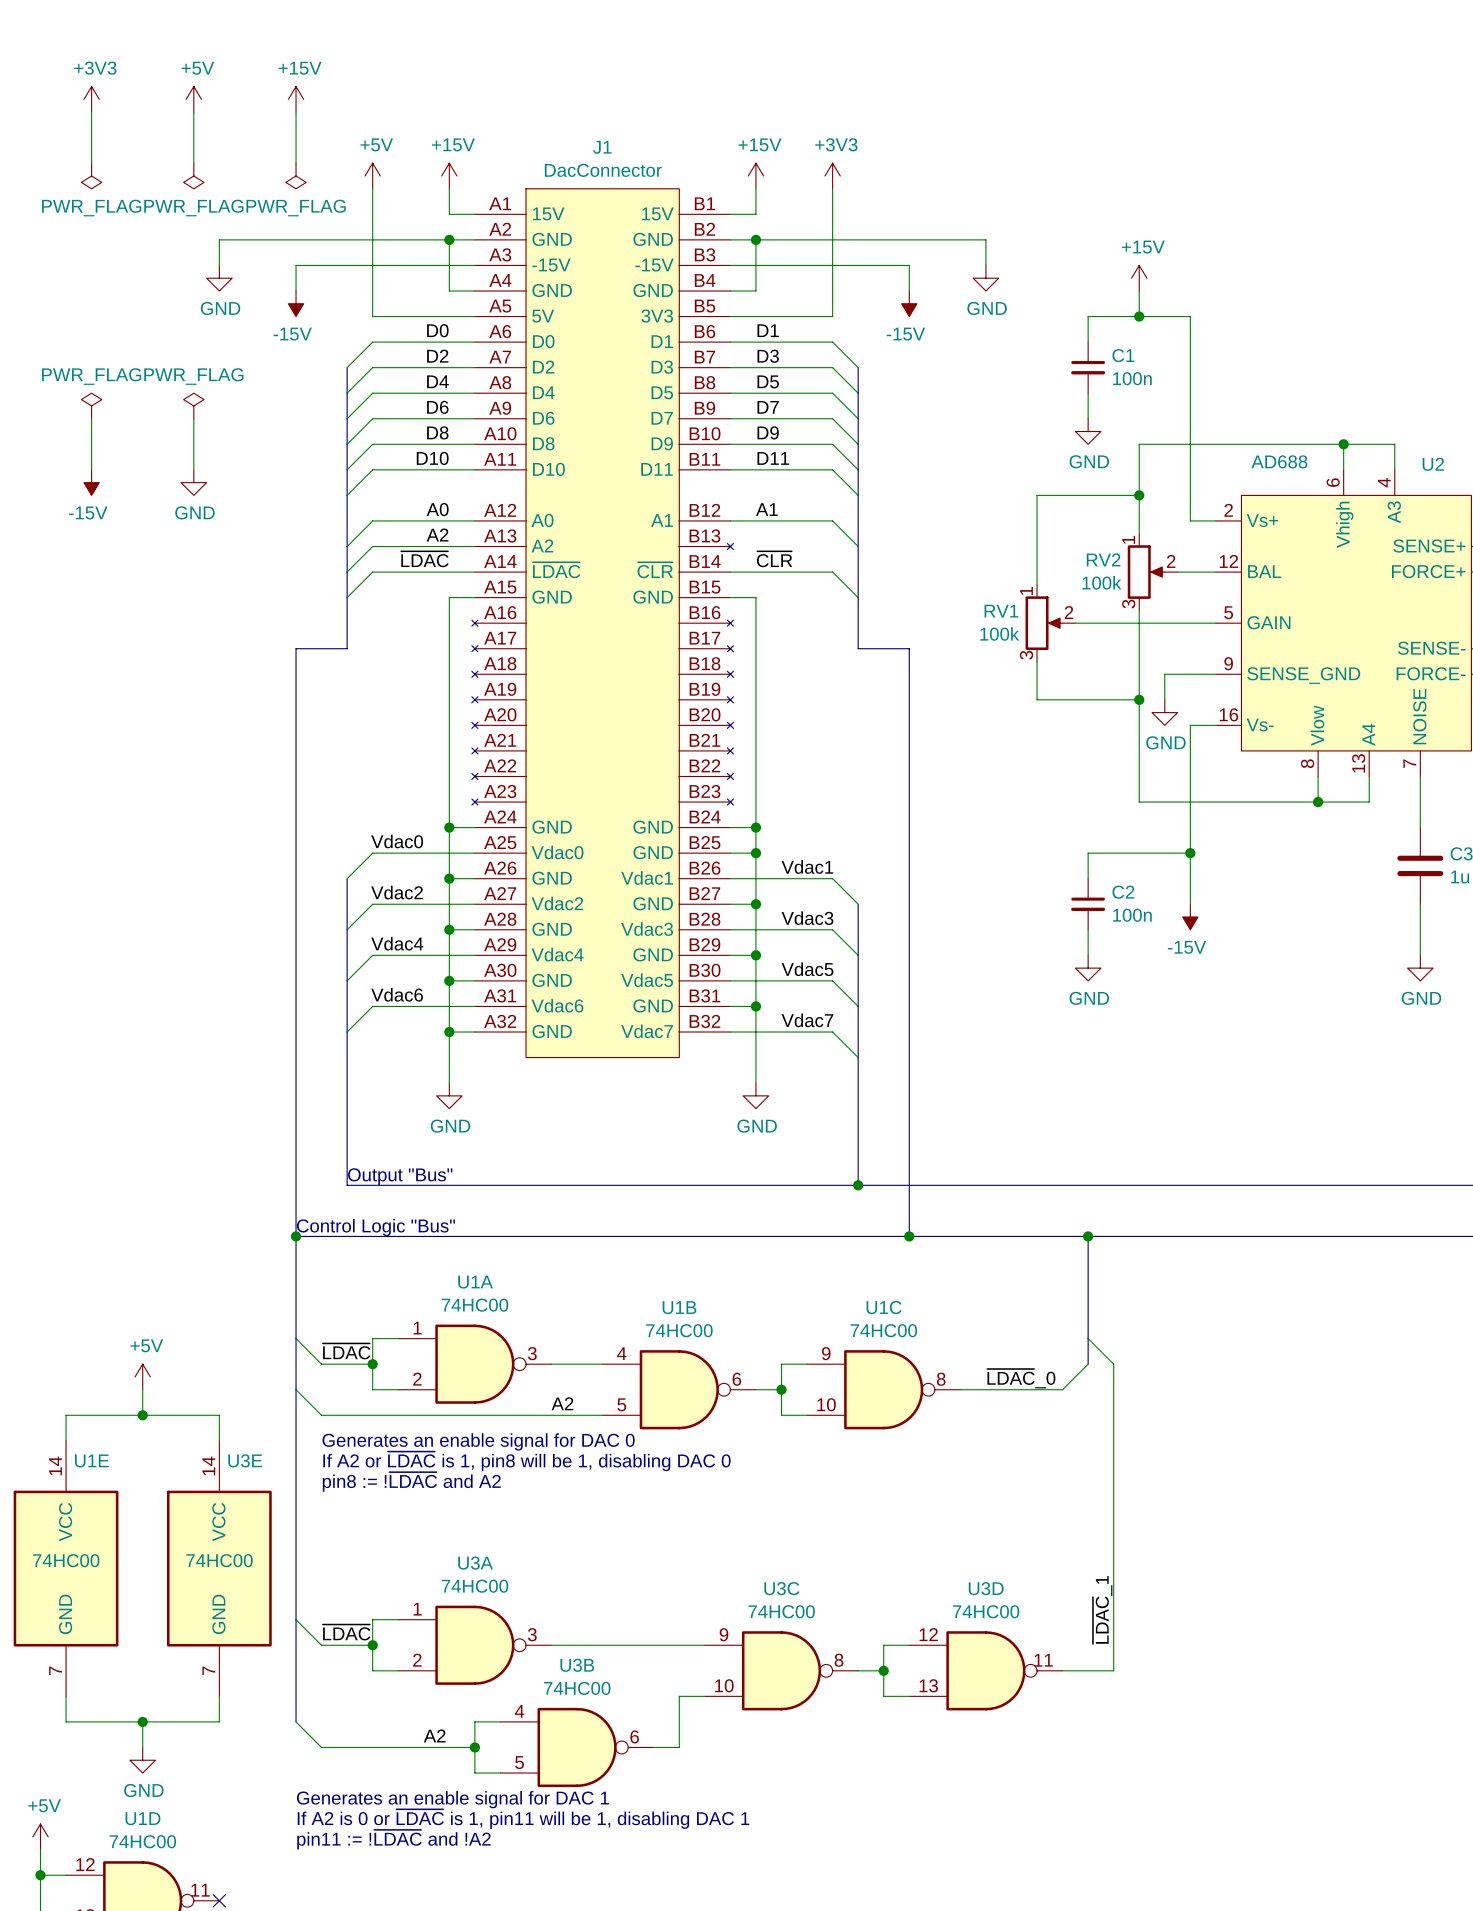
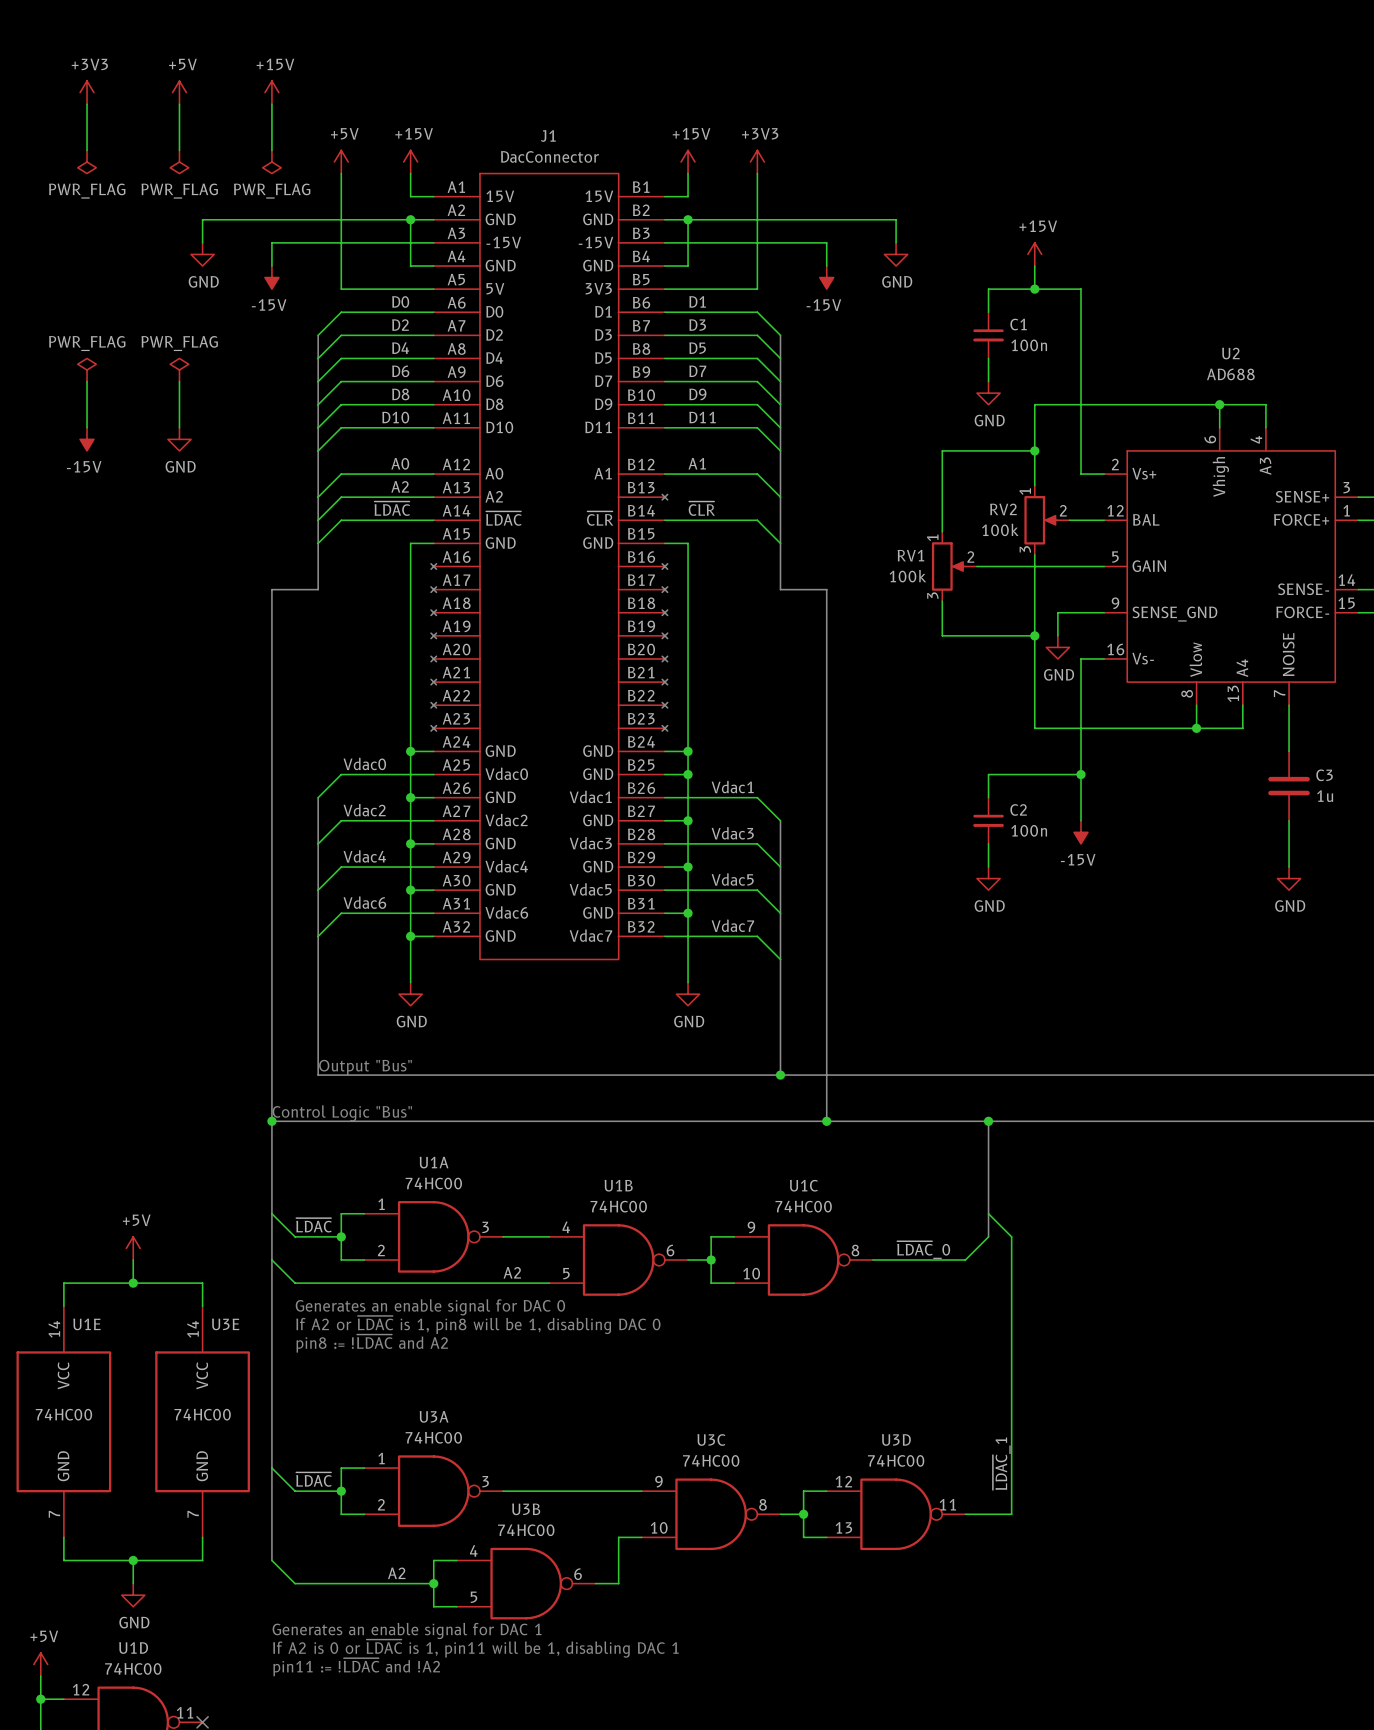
U2 value position: AD688 (1279, 461) -> AD688 (1230, 374)
U2 name position: U2 (1433, 464) -> U2 (1230, 353)

